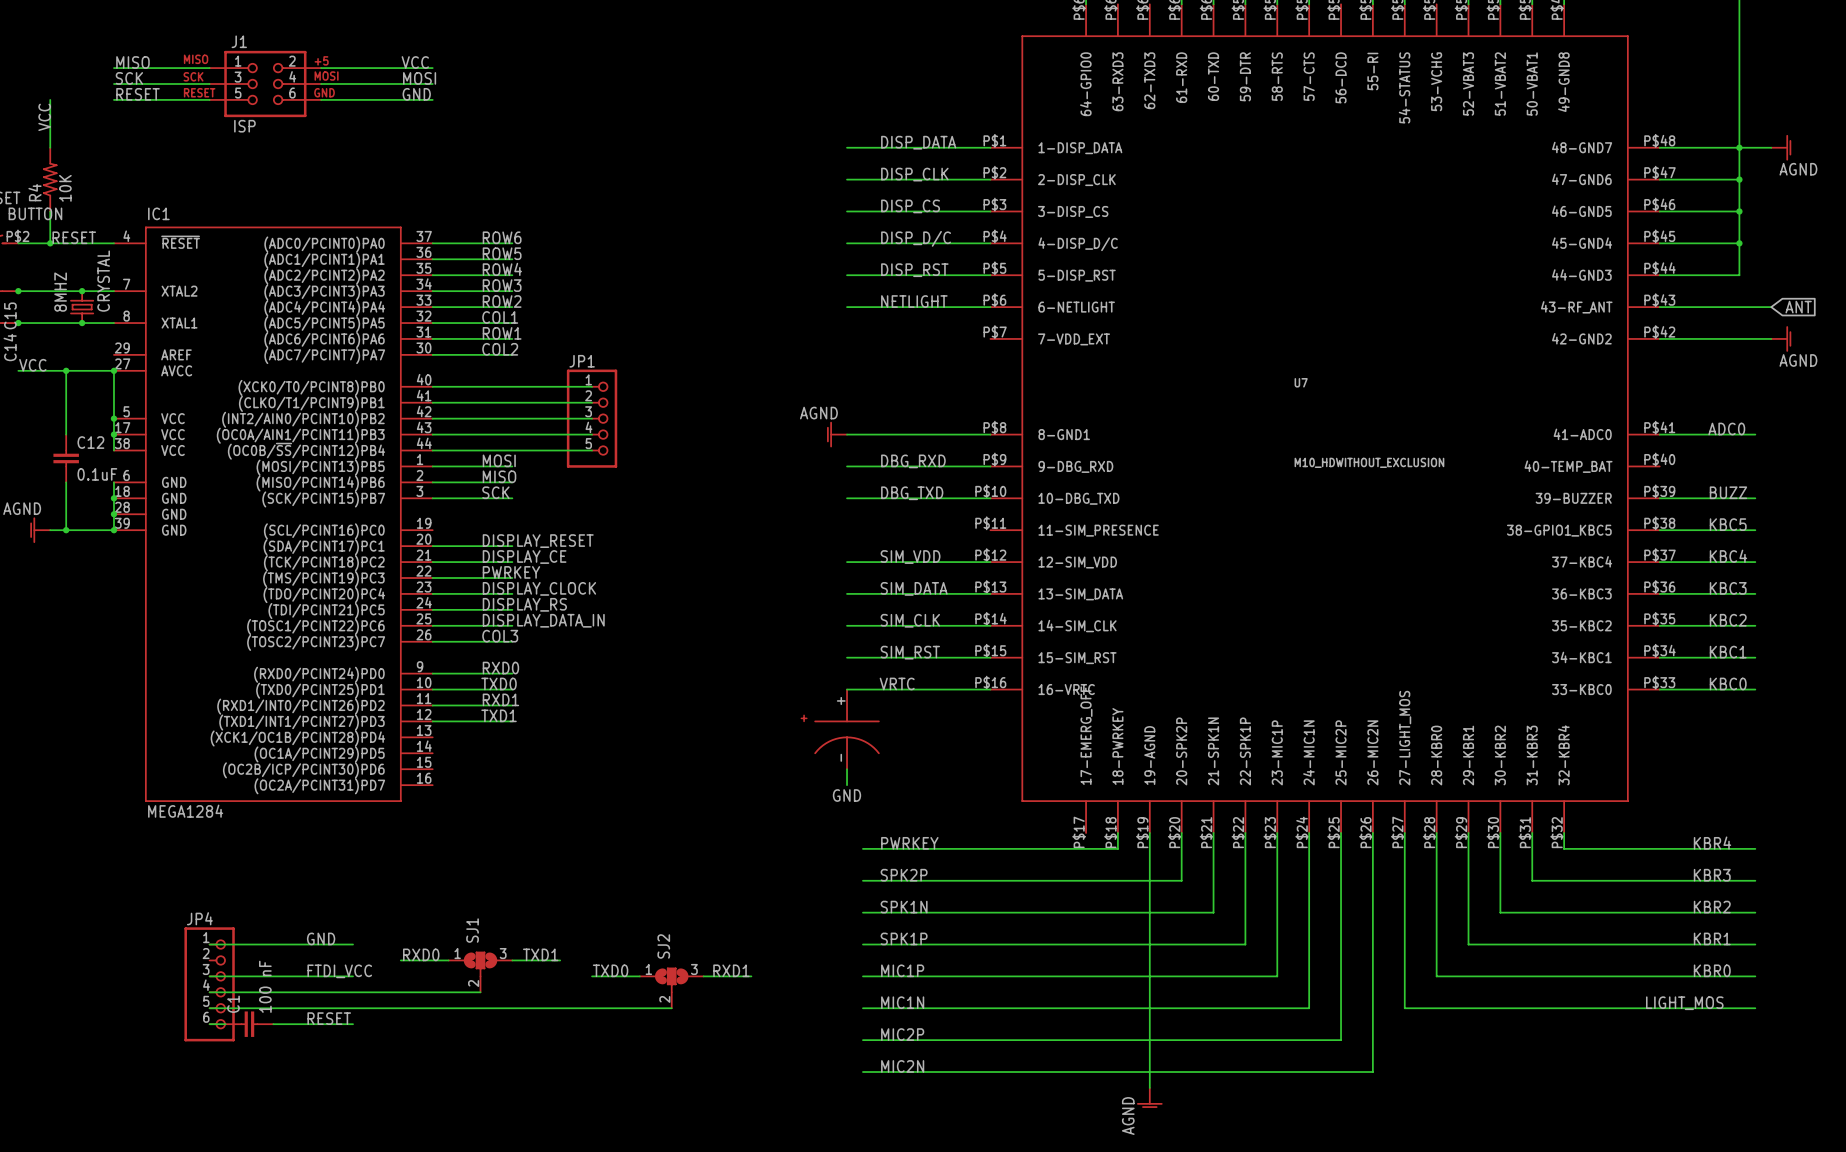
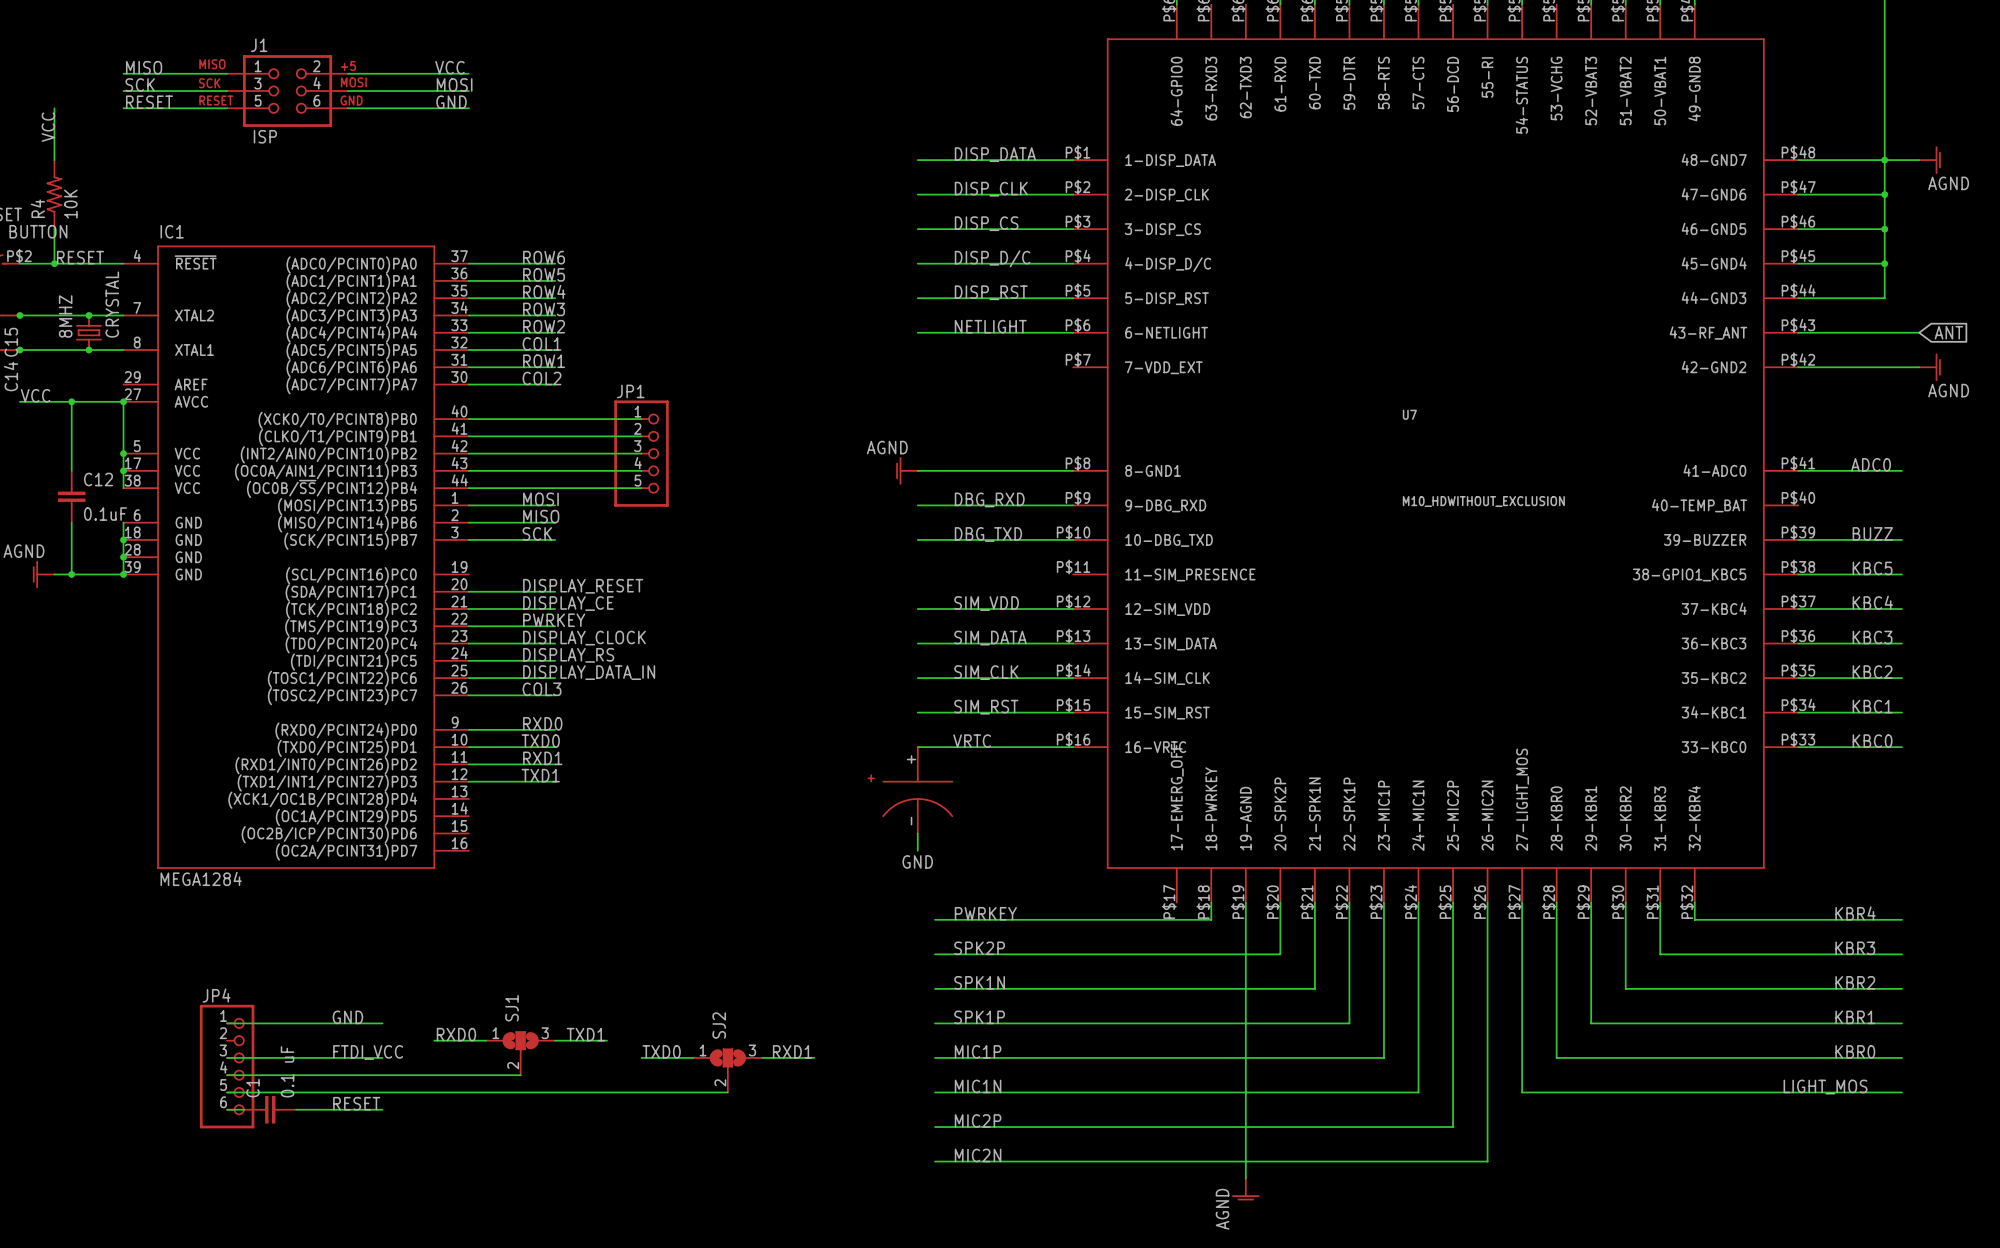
C1 value: 100 nF (265, 986) -> 0.1 uF (287, 1071)

